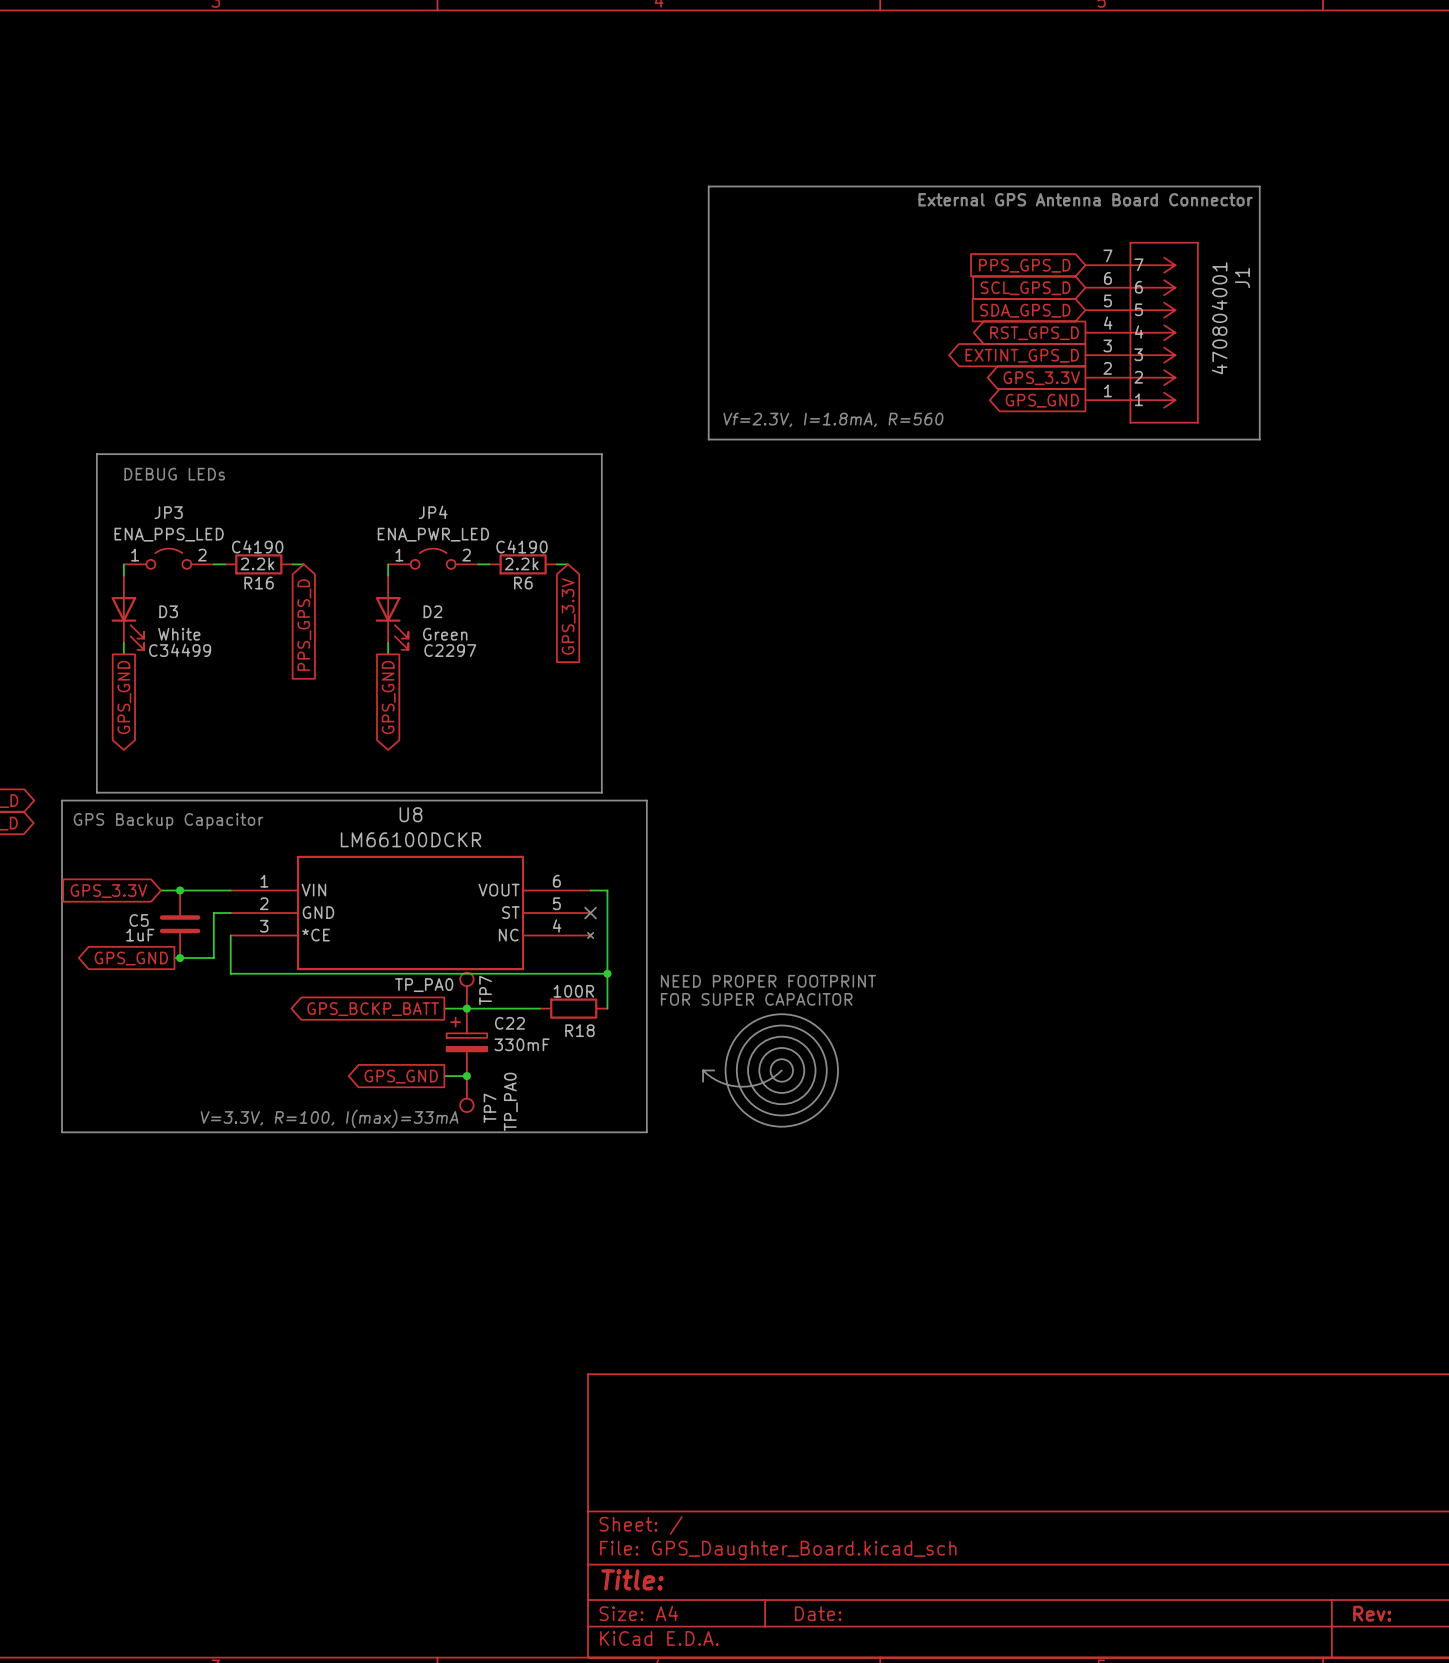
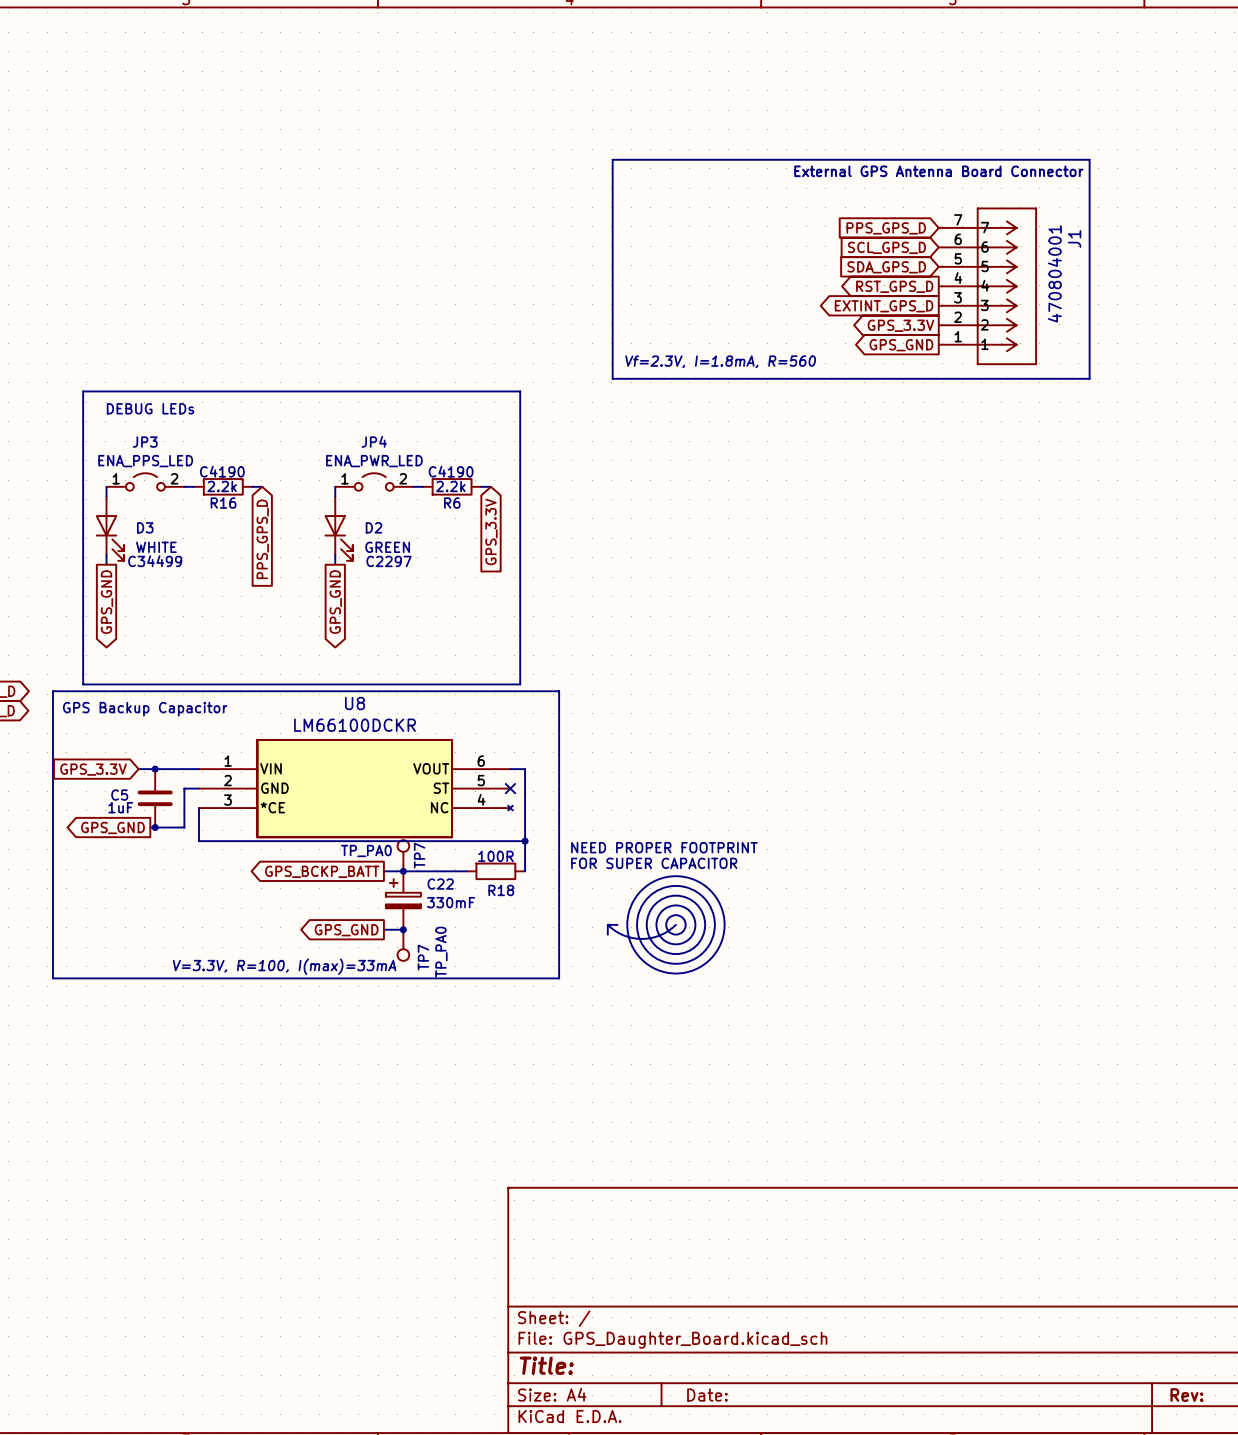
D3 value: White (179, 634) -> WHITE (156, 547)
D2 value: Green (445, 634) -> GREEN (387, 547)

